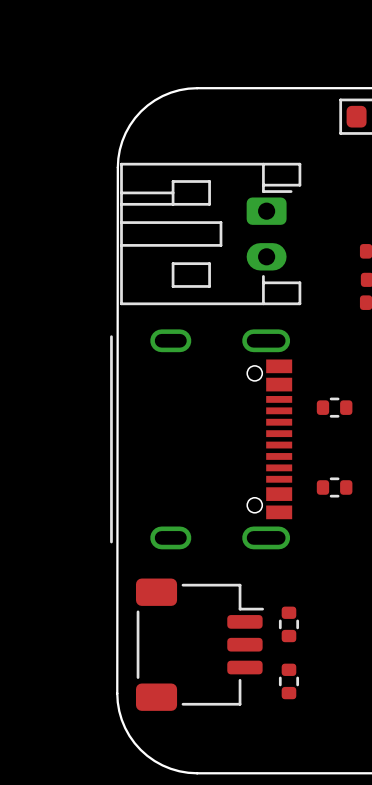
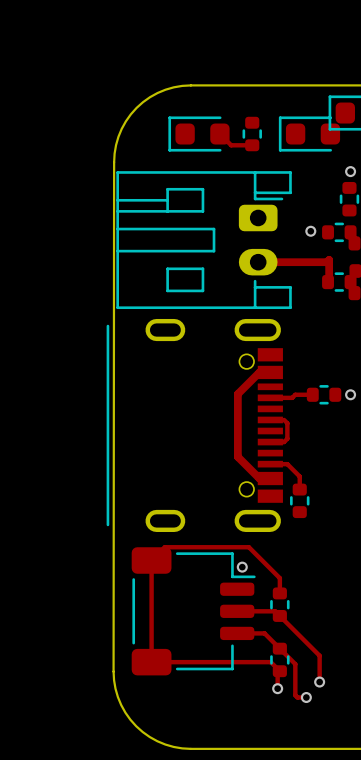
part: none -> (198, 134)
top track: none -> (219, 134) (231, 145) (252, 145)
part: none -> (252, 134)
part: none -> (309, 134)
via: none -> (350, 171)
part: none -> (349, 199)
part position: (210, 233) -> (204, 240)
via: none -> (310, 231)
part: none -> (339, 232)
top track: none -> (258, 262) (326, 262) (329, 259) (328, 282)
part: none -> (339, 282)
top track: none -> (270, 372) (259, 372) (237, 394) (237, 456) (259, 478) (270, 478)
top track: none -> (312, 394) (295, 394) (292, 397) (270, 397)
via: none -> (350, 394)
top track: none -> (284, 419) (287, 423) (287, 438) (284, 442) (270, 442)
top track: none -> (270, 464) (287, 464) (299, 476) (299, 489)
part rotation: 0° (334, 487) -> 90° clockwise (299, 500)
part position: (334, 487) -> (299, 500)
via: none -> (242, 567)
top track: none -> (279, 593) (279, 578) (248, 547) (164, 547) (151, 560) (151, 662) (270, 662) (279, 671) (277, 673) (277, 688)
top track: none -> (237, 611) (275, 611) (319, 655) (319, 682)
part position: (199, 644) -> (193, 611)
top track: none -> (237, 633) (264, 633) (295, 664) (295, 695) (297, 697) (306, 697)
via: none -> (319, 682)
via: none -> (277, 688)
via: none -> (306, 697)

